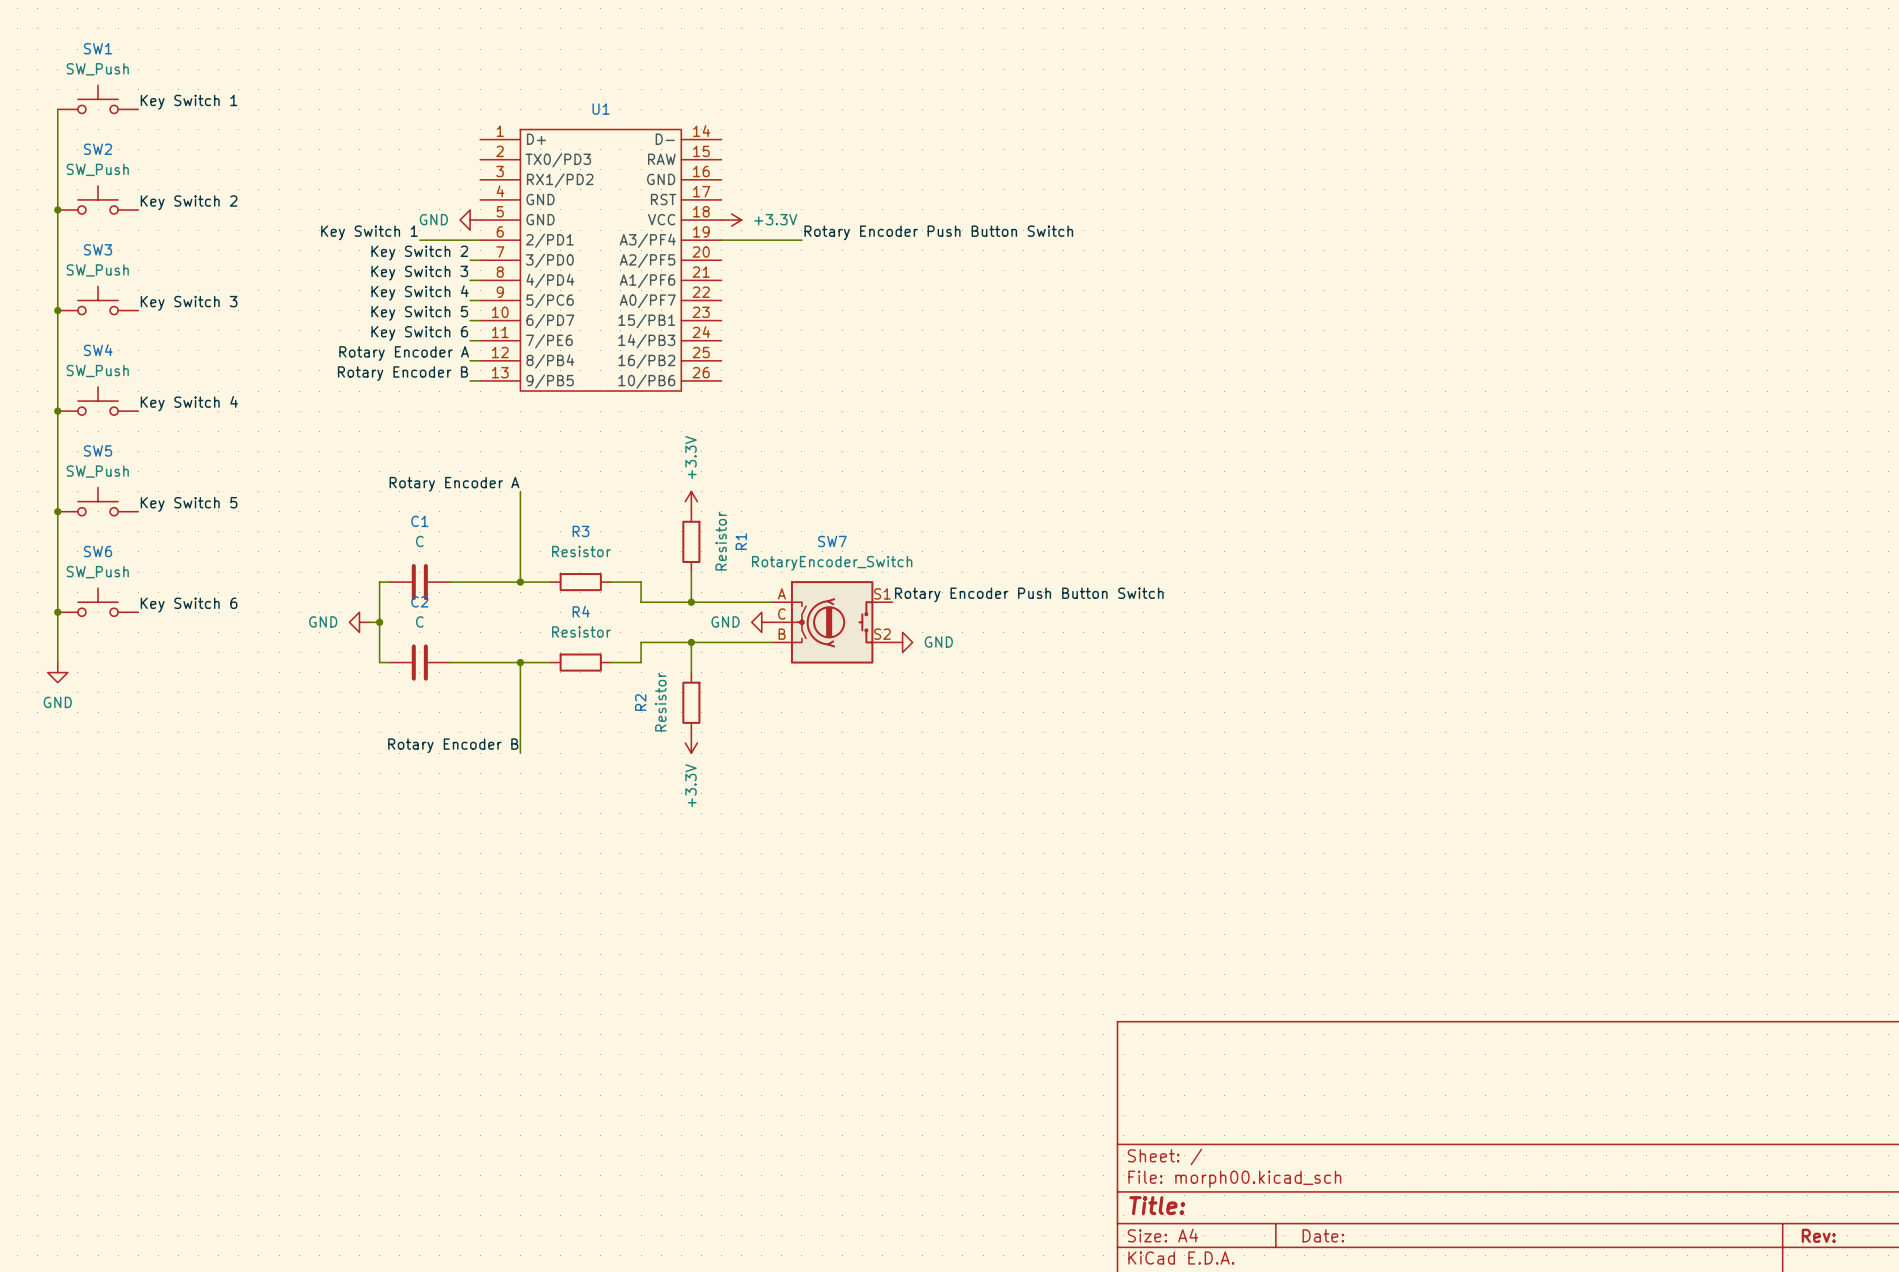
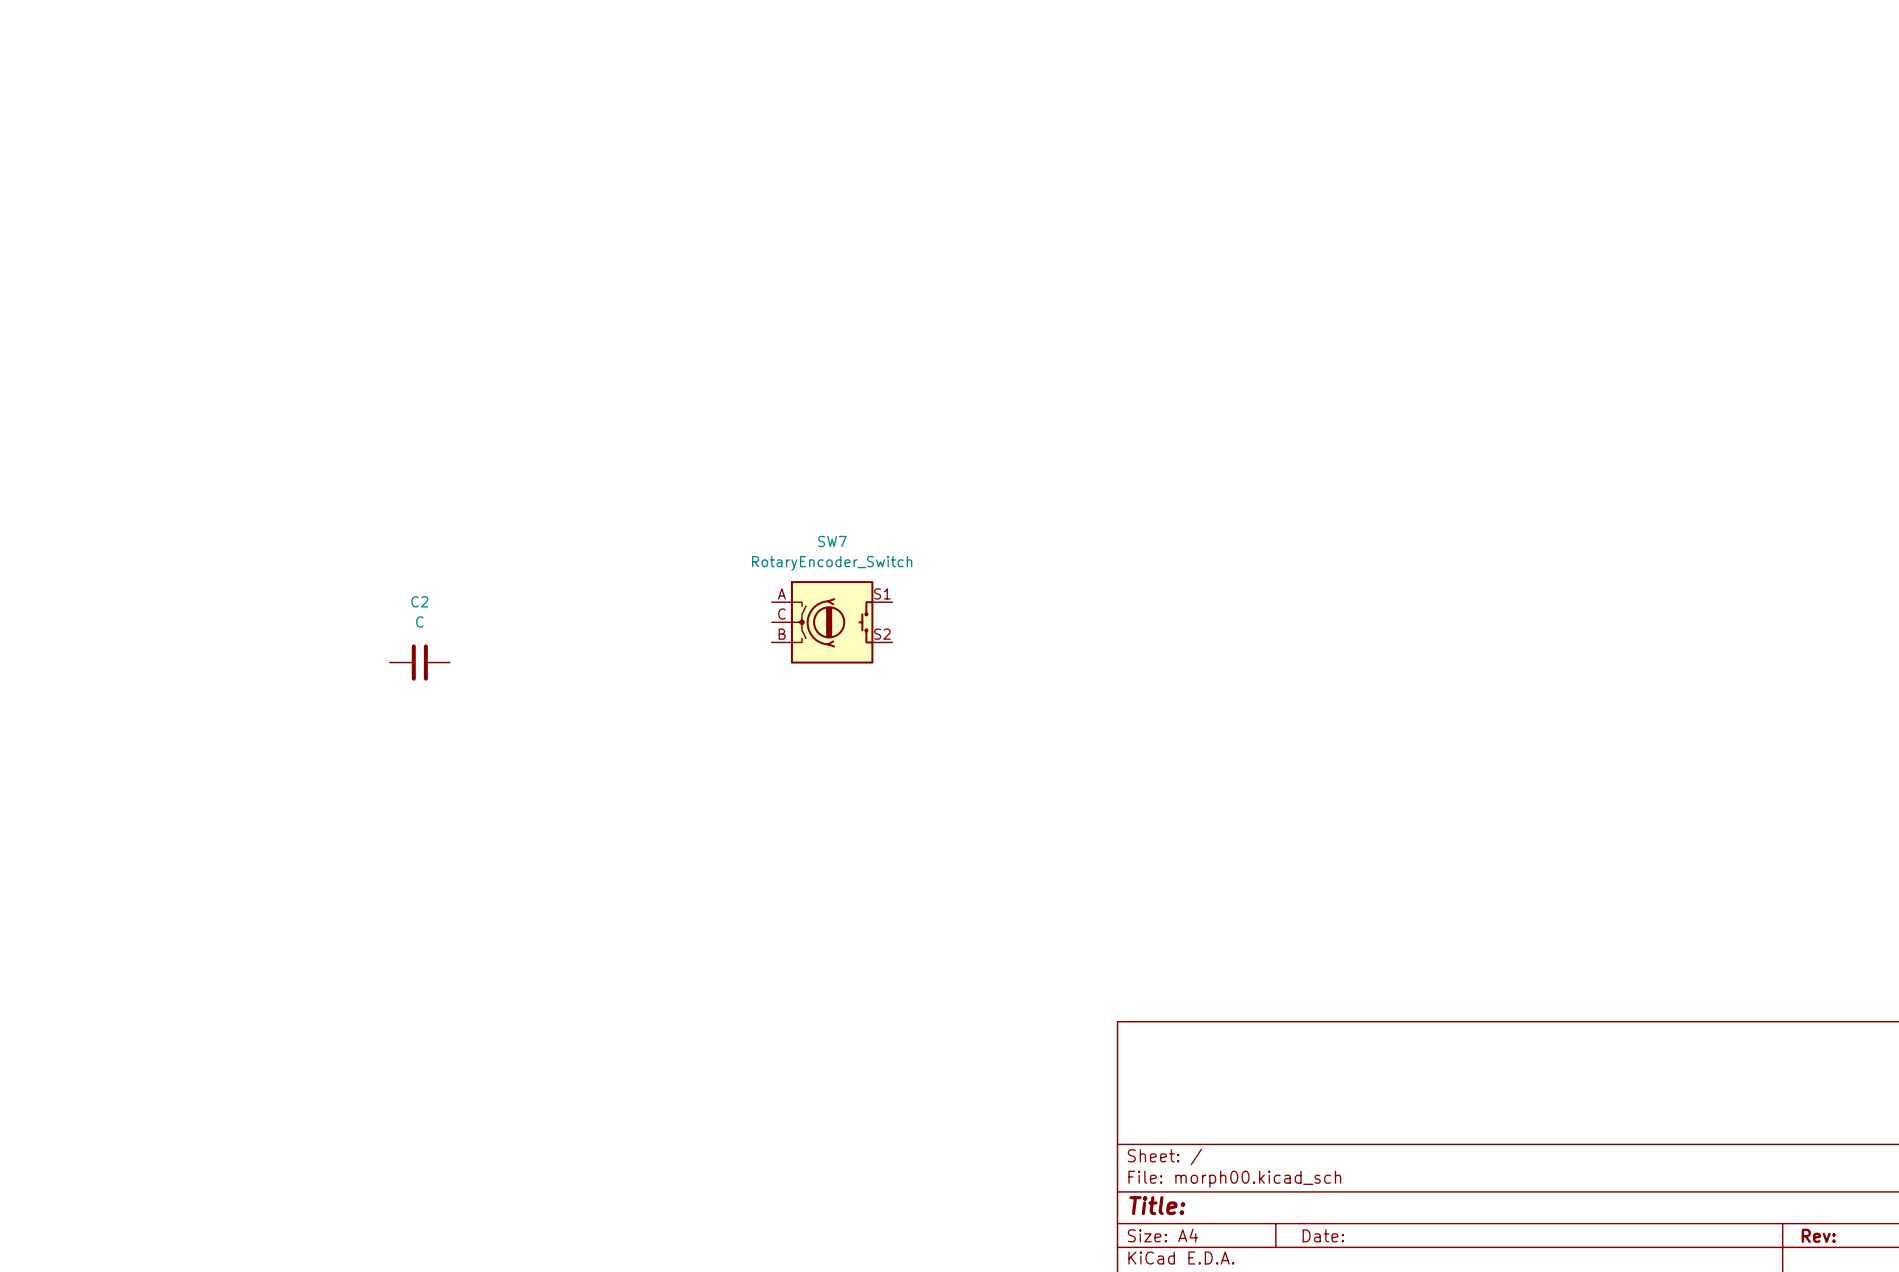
SW1: SW_Push (98, 99) -> none
label: Key Switch 1 (189, 102) -> none
wire: (57, 109) (57, 662) -> none
SW2: SW_Push (98, 199) -> none
label: Key Switch 2 (189, 202) -> none
junction: (57, 209) -> none
power symbol: GND (470, 220) -> none
power symbol: +3.3V (731, 220) -> none
label: Key Switch 1 (369, 232) -> none
label: Rotary Encoder Push Button Switch (938, 232) -> none
wire: (419, 240) (480, 240) -> none
wire: (721, 240) (801, 240) -> none
label: Key Switch 2 (419, 252) -> none
wire: (470, 260) (480, 260) -> none
U1: (600, 260) -> none
label: Key Switch 3 (419, 273) -> none
wire: (470, 280) (480, 280) -> none
label: Key Switch 4 (419, 292) -> none
SW3: SW_Push (98, 300) -> none
wire: (470, 300) (480, 300) -> none
label: Key Switch 3 (189, 303) -> none
junction: (57, 310) -> none
label: Key Switch 5 (419, 313) -> none
wire: (470, 320) (480, 320) -> none
label: Key Switch 6 (419, 333) -> none
wire: (470, 340) (480, 340) -> none
label: Rotary Encoder A (404, 353) -> none
wire: (470, 360) (480, 360) -> none
label: Rotary Encoder B (402, 373) -> none
wire: (470, 380) (480, 380) -> none
SW4: SW_Push (98, 401) -> none
label: Key Switch 4 (189, 403) -> none
junction: (57, 411) -> none
label: Rotary Encoder A (454, 484) -> none
wire: (520, 491) (520, 582) -> none
SW5: SW_Push (98, 501) -> none
power symbol: +3.3V (691, 501) -> none
label: Key Switch 5 (189, 504) -> none
junction: (57, 511) -> none
R1: Resistor (691, 541) -> none
wire: (691, 572) (691, 602) -> none
wire: (389, 582) (379, 582) (379, 662) (389, 662) -> none
C1: C (419, 582) -> none
wire: (450, 582) (550, 582) -> none
junction: (520, 582) -> none
R3: Resistor (580, 582) -> none
wire: (610, 582) (641, 582) (641, 602) (771, 602) -> none
label: Rotary Encoder Push Button Switch (1029, 594) -> none
SW6: SW_Push (98, 602) -> none
junction: (691, 602) -> none
label: Key Switch 6 (189, 604) -> none
junction: (57, 612) -> none
power symbol: GND (359, 622) -> none
wire: (369, 622) (379, 622) -> none
junction: (379, 622) -> none
power symbol: GND (761, 622) -> none
wire: (691, 642) (691, 672) -> none
junction: (691, 642) -> none
wire: (771, 642) (641, 642) (641, 662) (610, 662) -> none
power symbol: GND (902, 642) -> none
wire: (450, 662) (550, 662) -> none
wire: (520, 662) (520, 753) -> none
junction: (520, 662) -> none
R4: Resistor (580, 662) -> none
power symbol: GND (57, 672) -> none
R2: Resistor (691, 702) -> none
power symbol: +3.3V (691, 743) -> none
label: Rotary Encoder B (453, 745) -> none

